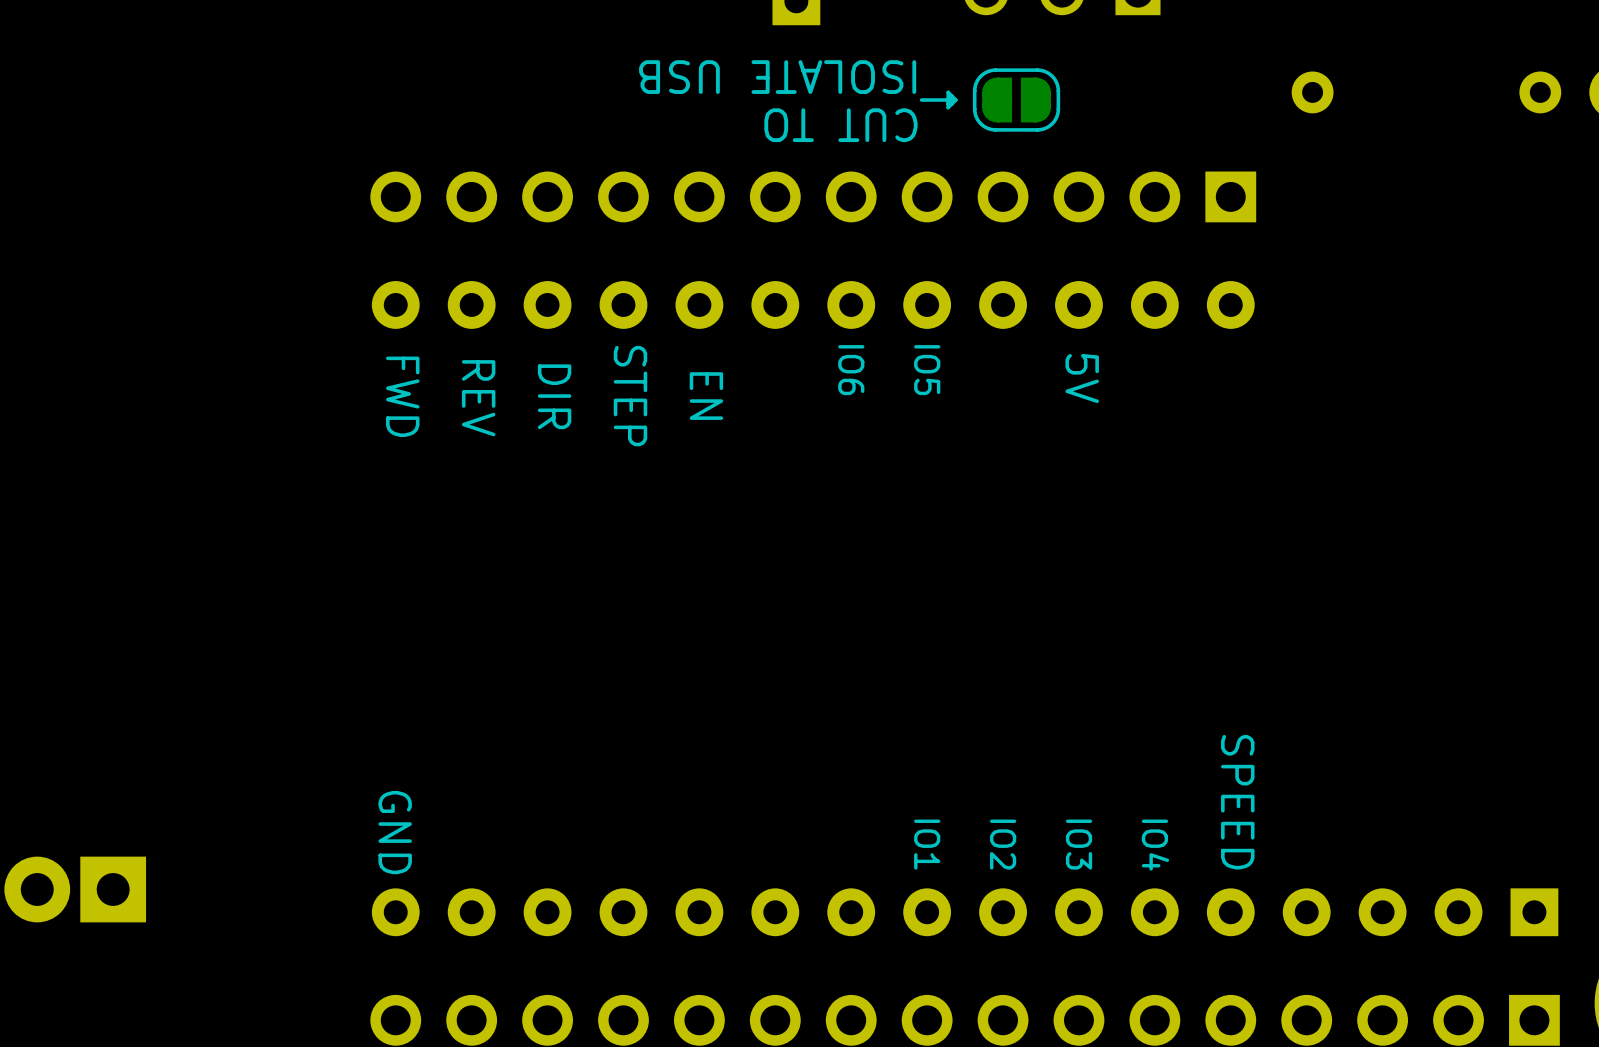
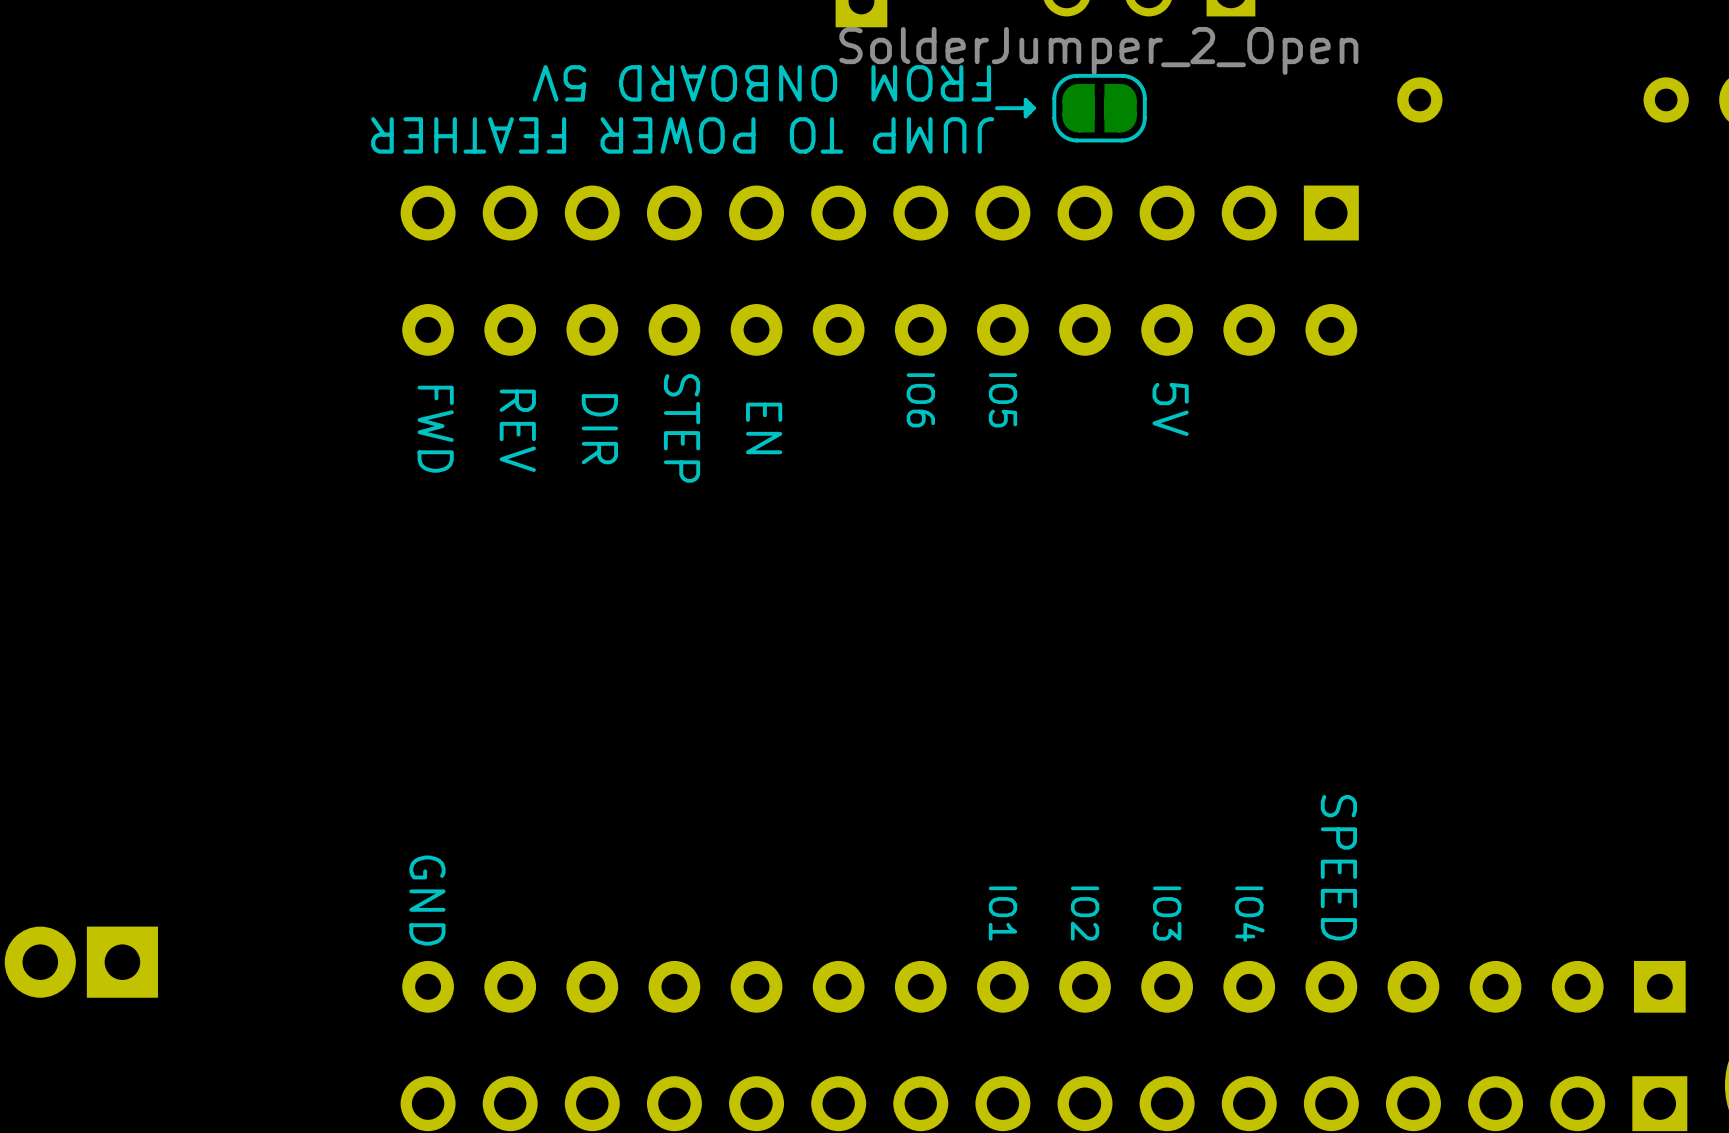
part value: none -> SolderJumper_2_Open (1098, 50)
text: ISOLATE USB (777, 77) -> FROM ONBOARD 5V (761, 83)
text: CUT TO (840, 125) -> JUMP TO POWER FEATHER (682, 135)

